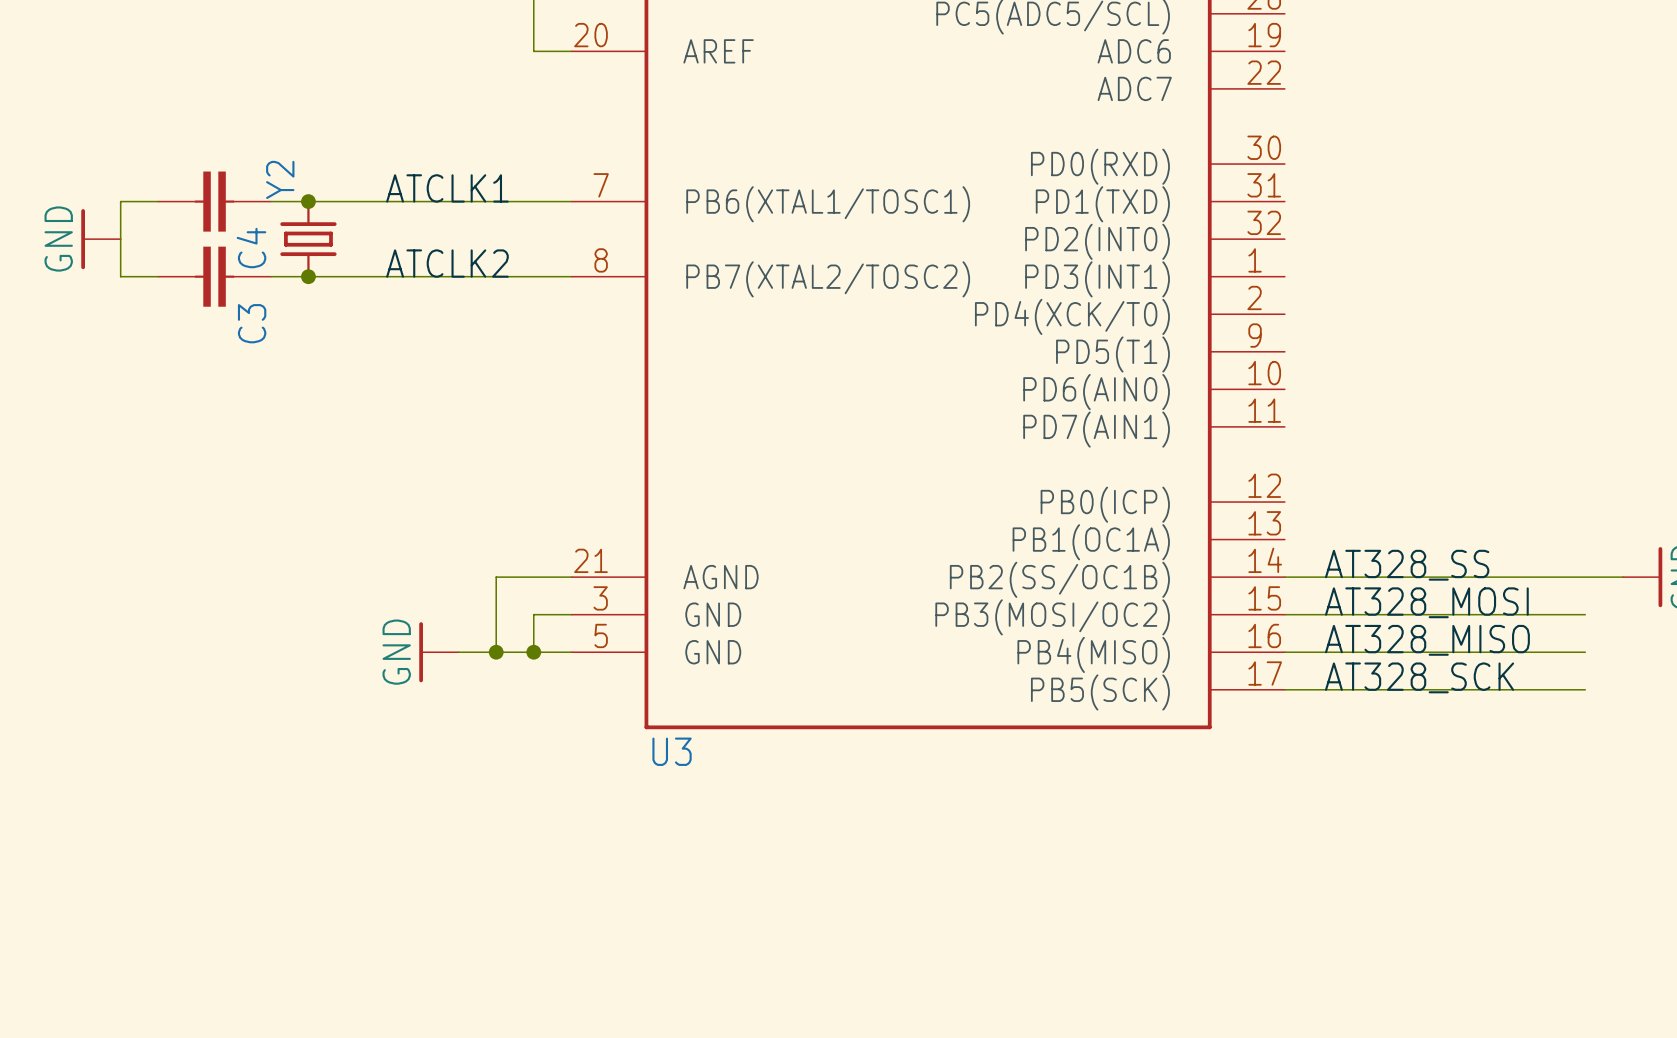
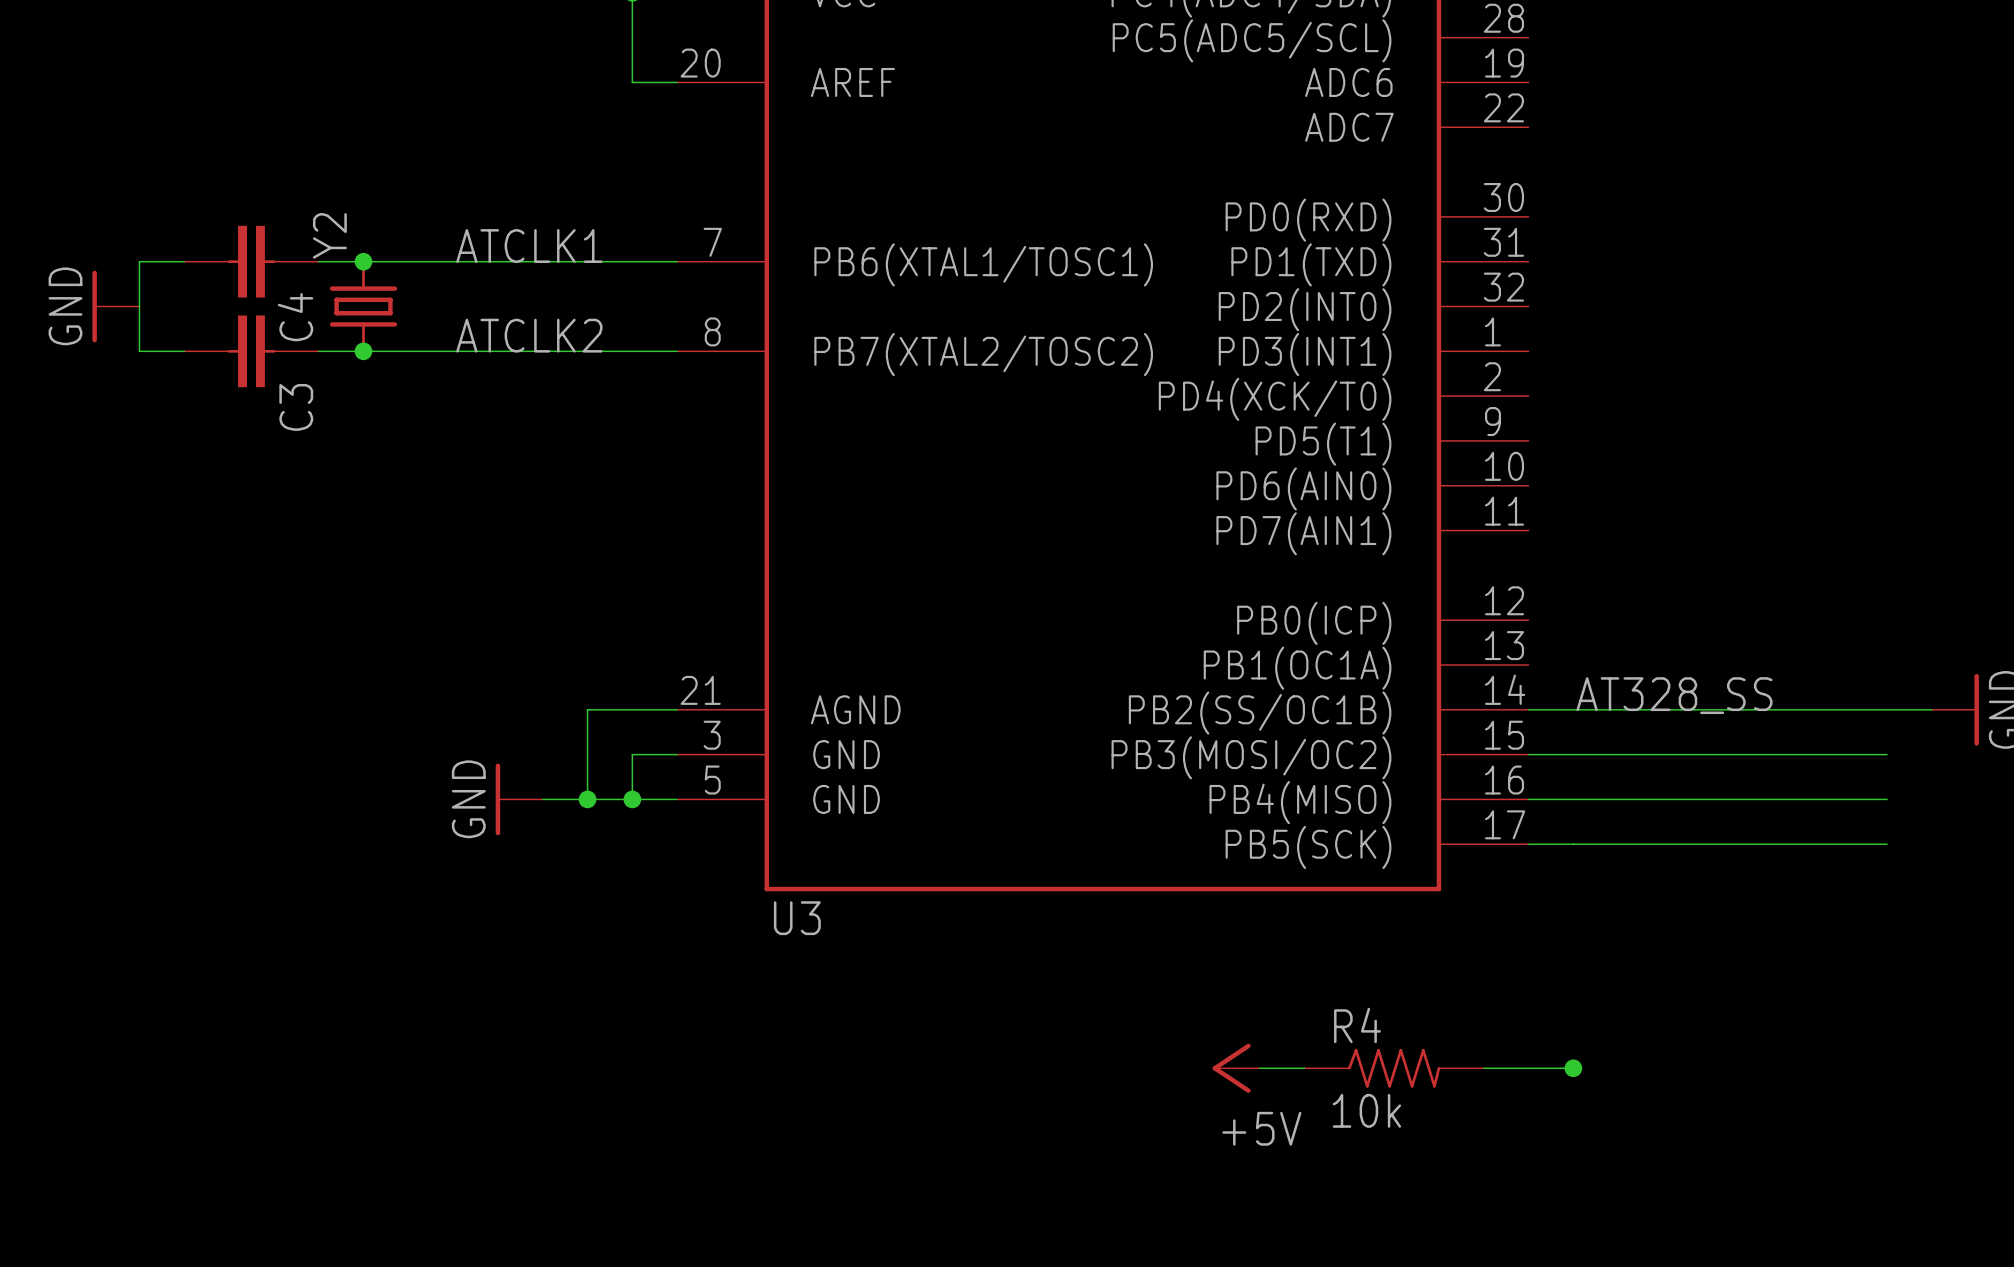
label: AT328_MOSI (1426, 602) -> none
label: AT328_MISO (1427, 640) -> none
label: AT328_SCK (1419, 677) -> none
power symbol: none -> +5V (1236, 1068)
wire: none -> (1259, 1068) (1304, 1068)
R4: none -> 10k (1394, 1068)
wire: none -> (1483, 1068) (1573, 1068)
junction: none -> (1573, 1068)

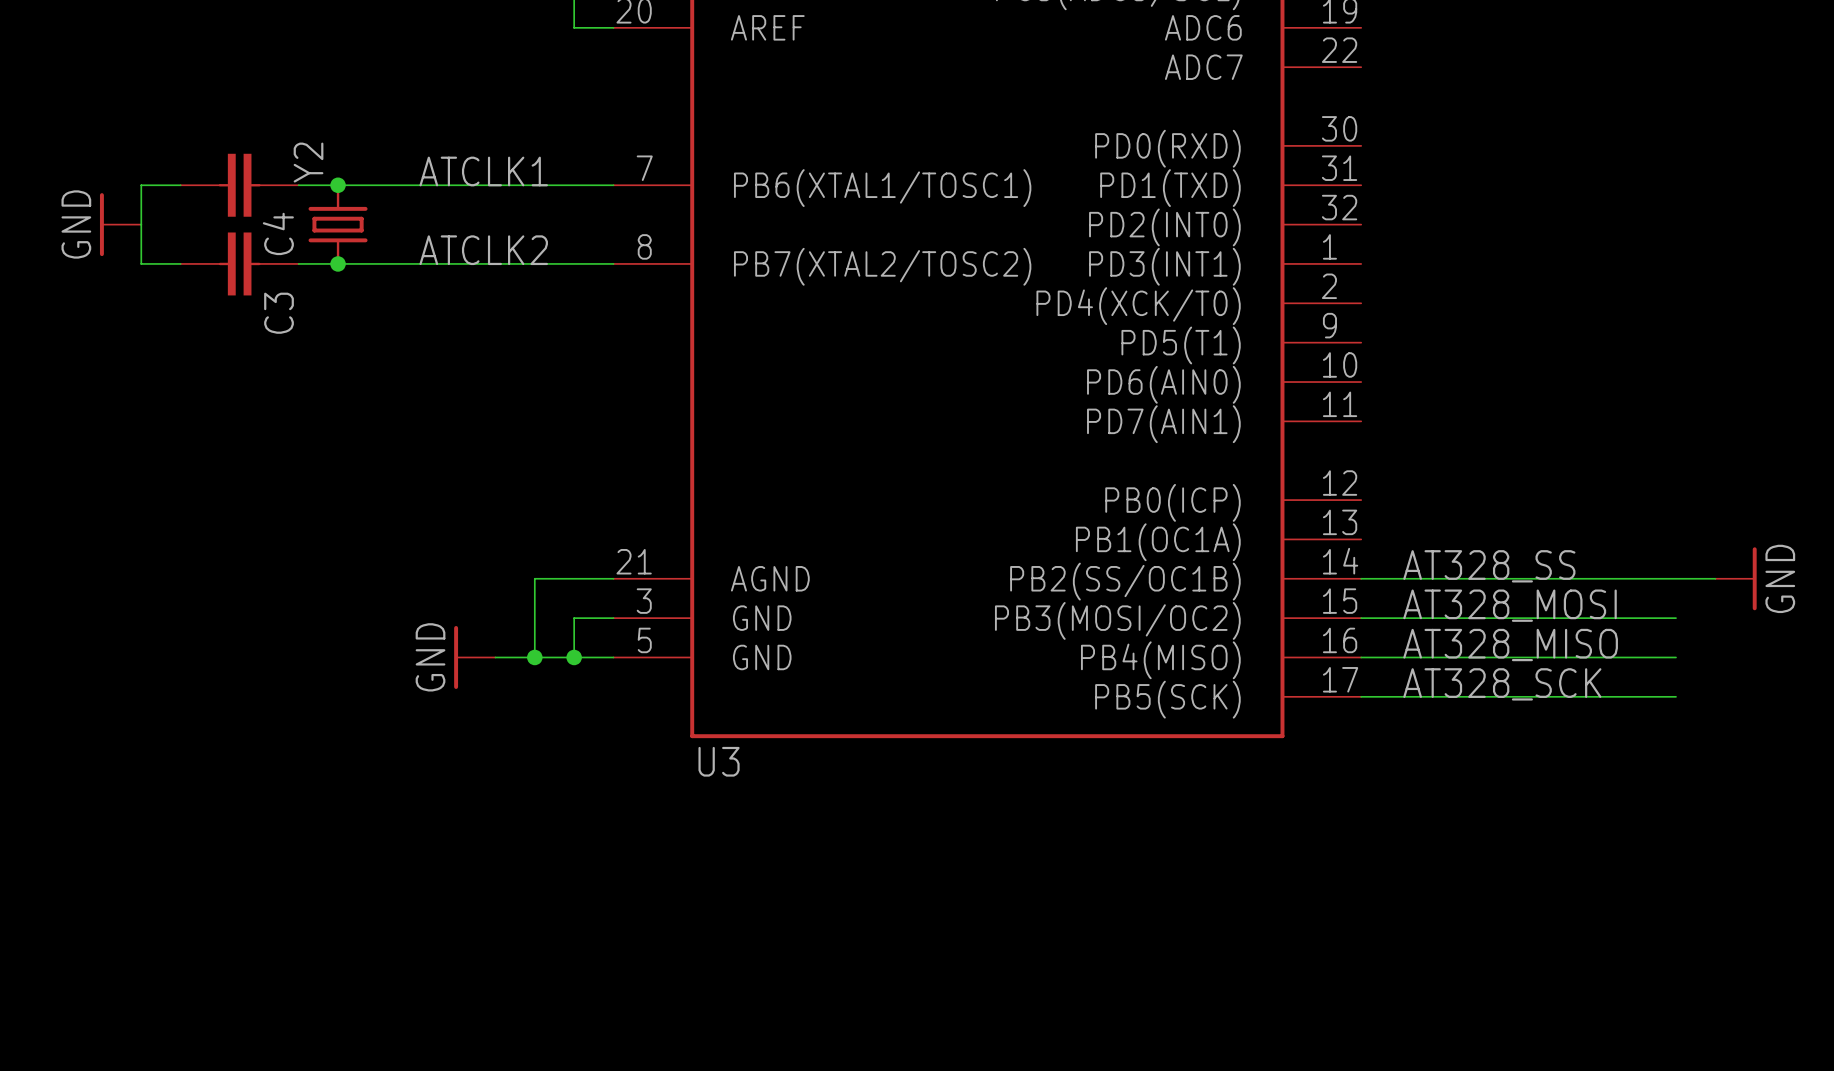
label: none -> AT328_MOSI (1510, 605)
label: none -> AT328_MISO (1510, 645)
label: none -> AT328_SCK (1502, 684)
power symbol: +5V (1236, 1068) -> none
wire: (1259, 1068) (1304, 1068) -> none
R4: 10k (1394, 1068) -> none
wire: (1483, 1068) (1573, 1068) -> none
junction: (1573, 1068) -> none

